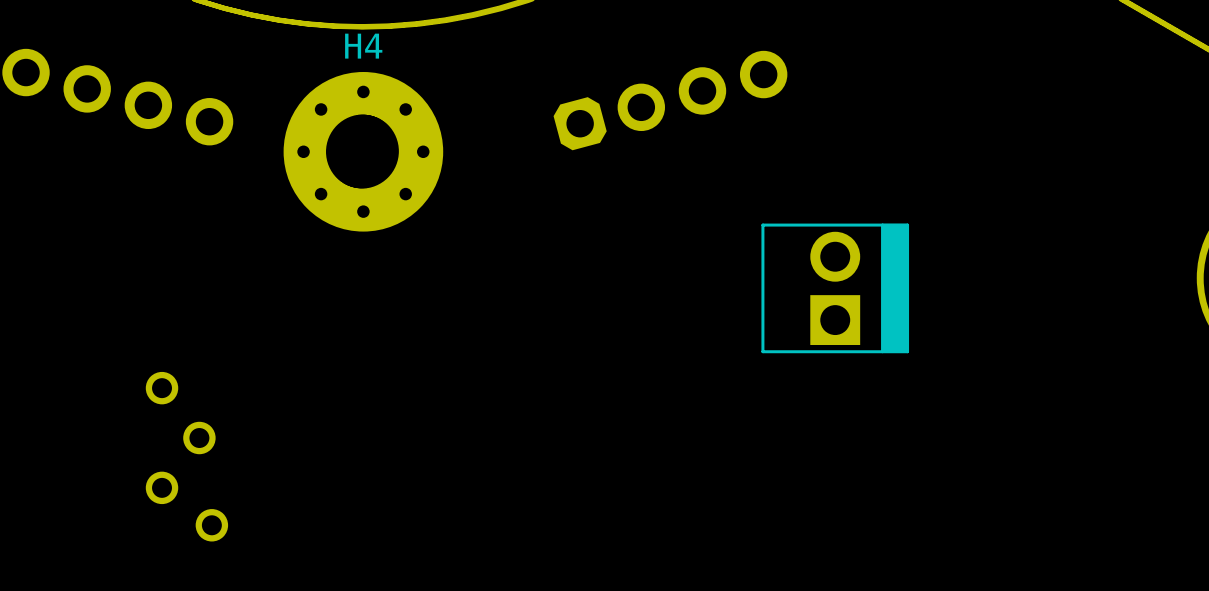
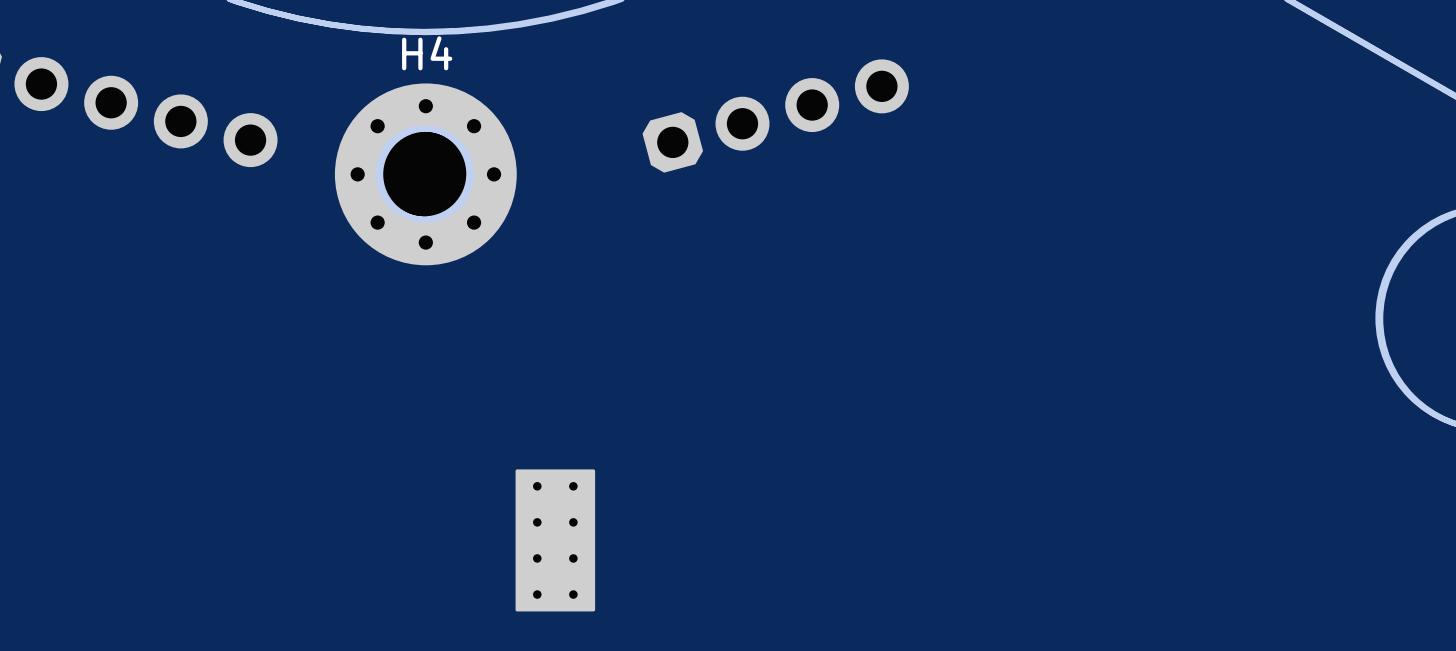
part: (835, 288) -> none
part: (162, 388) -> none
part: (199, 438) -> none
part: none -> (555, 540)
part: (162, 487) -> none
part: (211, 525) -> none

